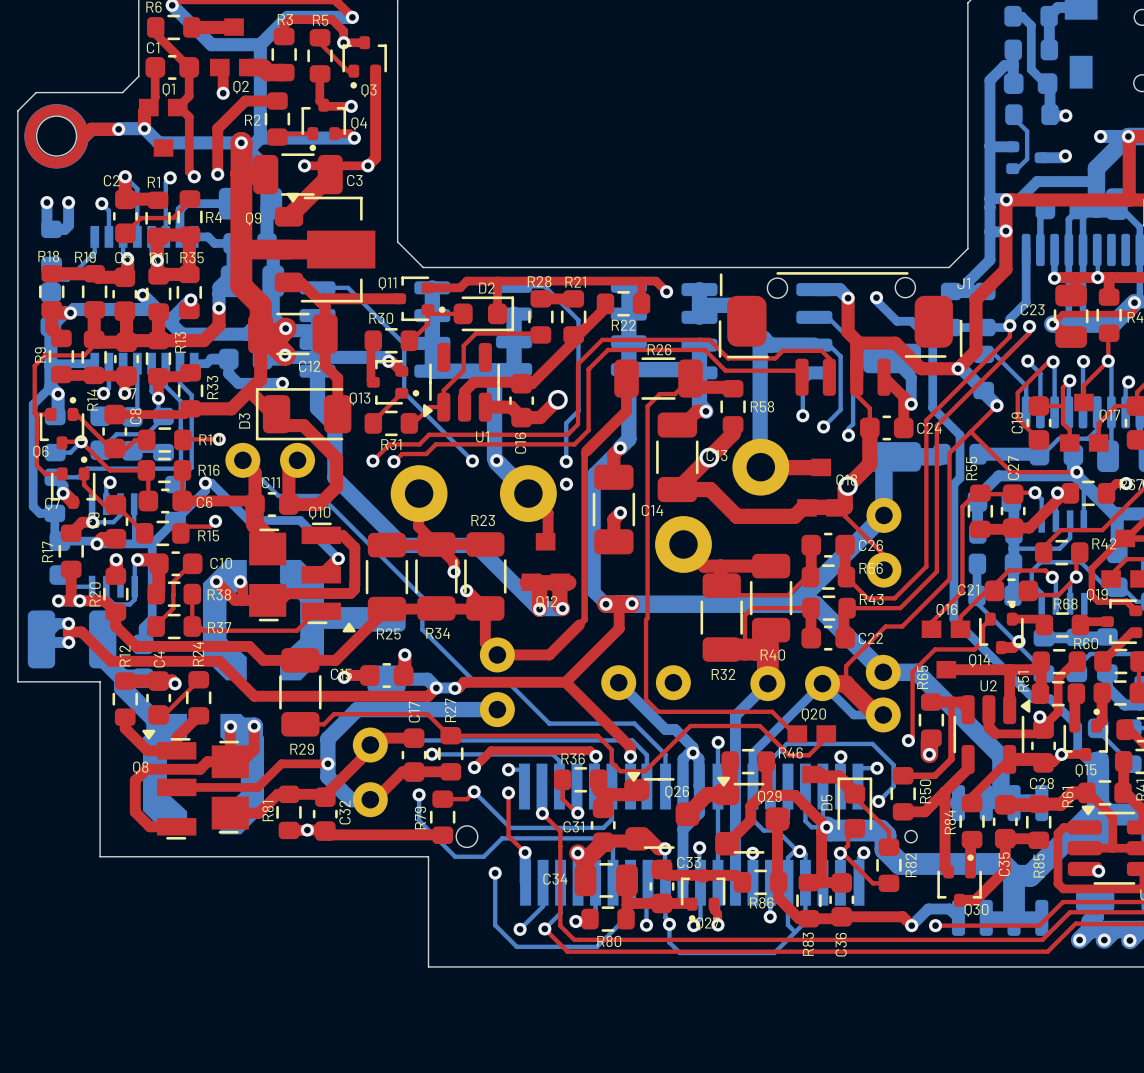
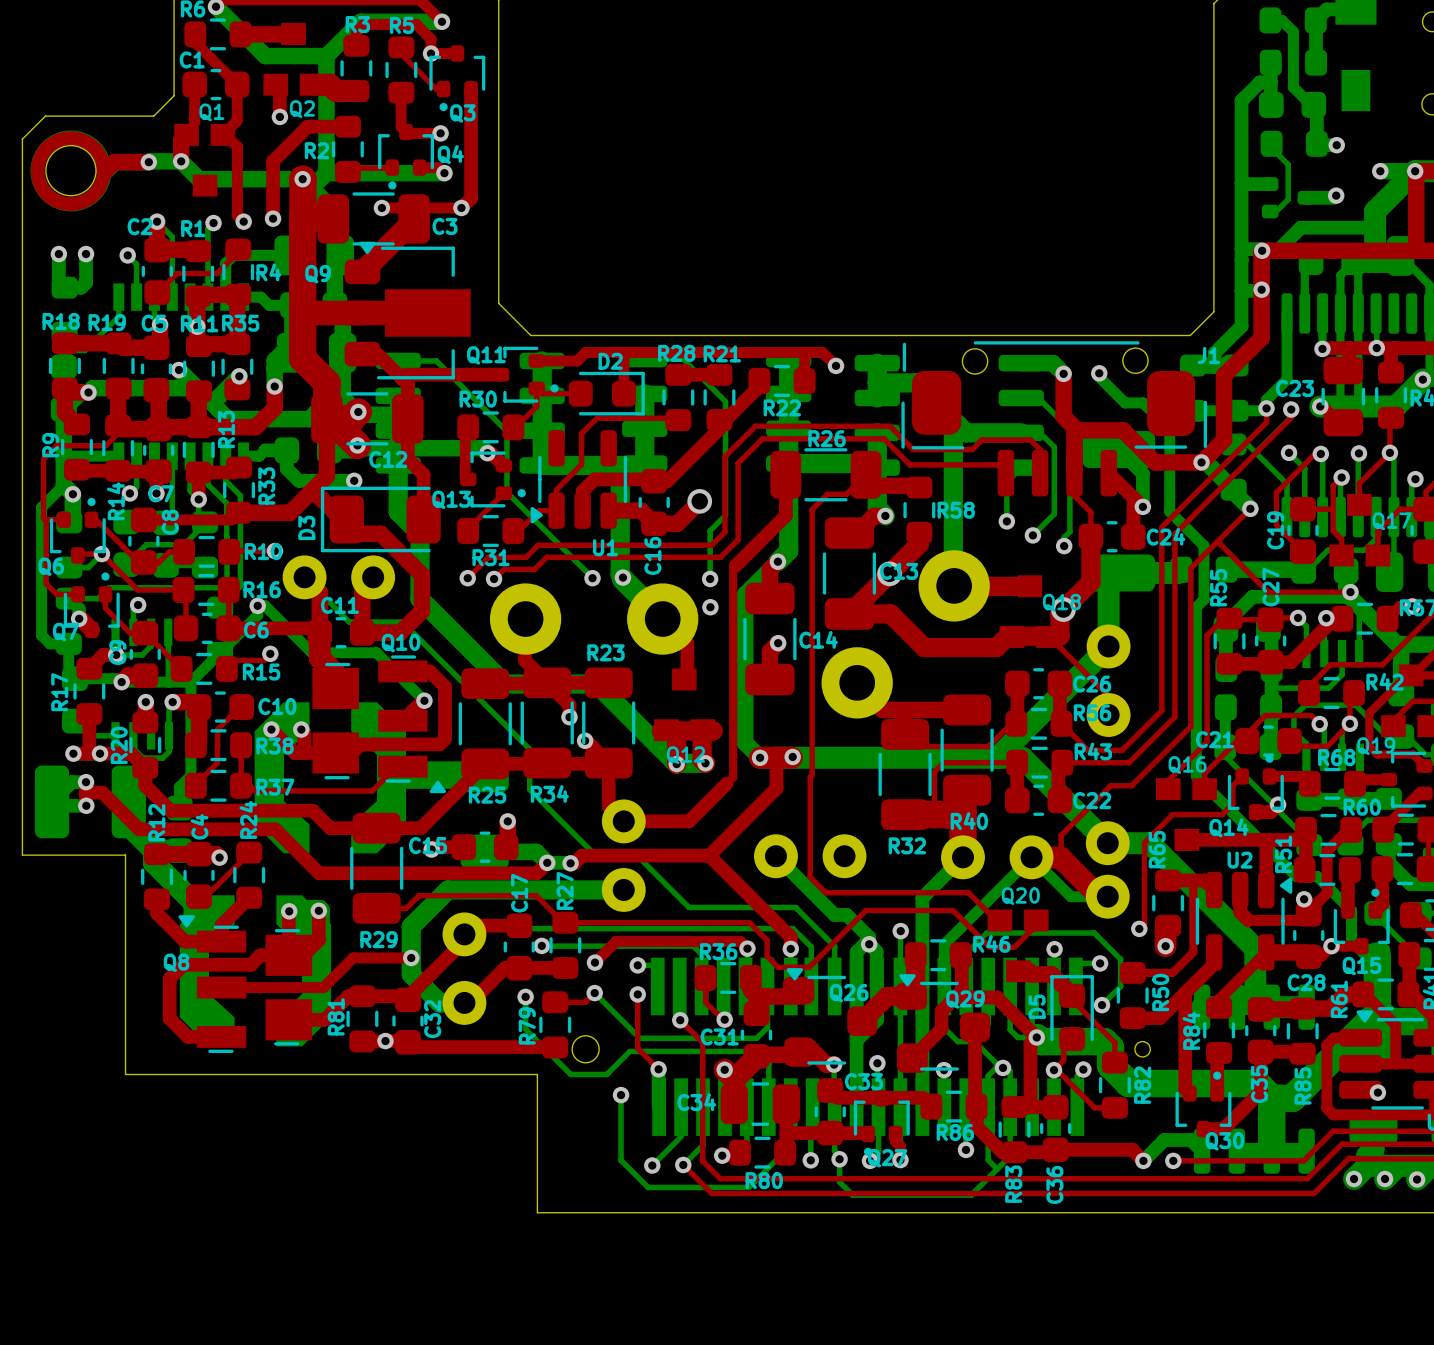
top track: (1134, 302) (1134, 310) (1130, 314) (1062, 314) (1052, 324) -> none

